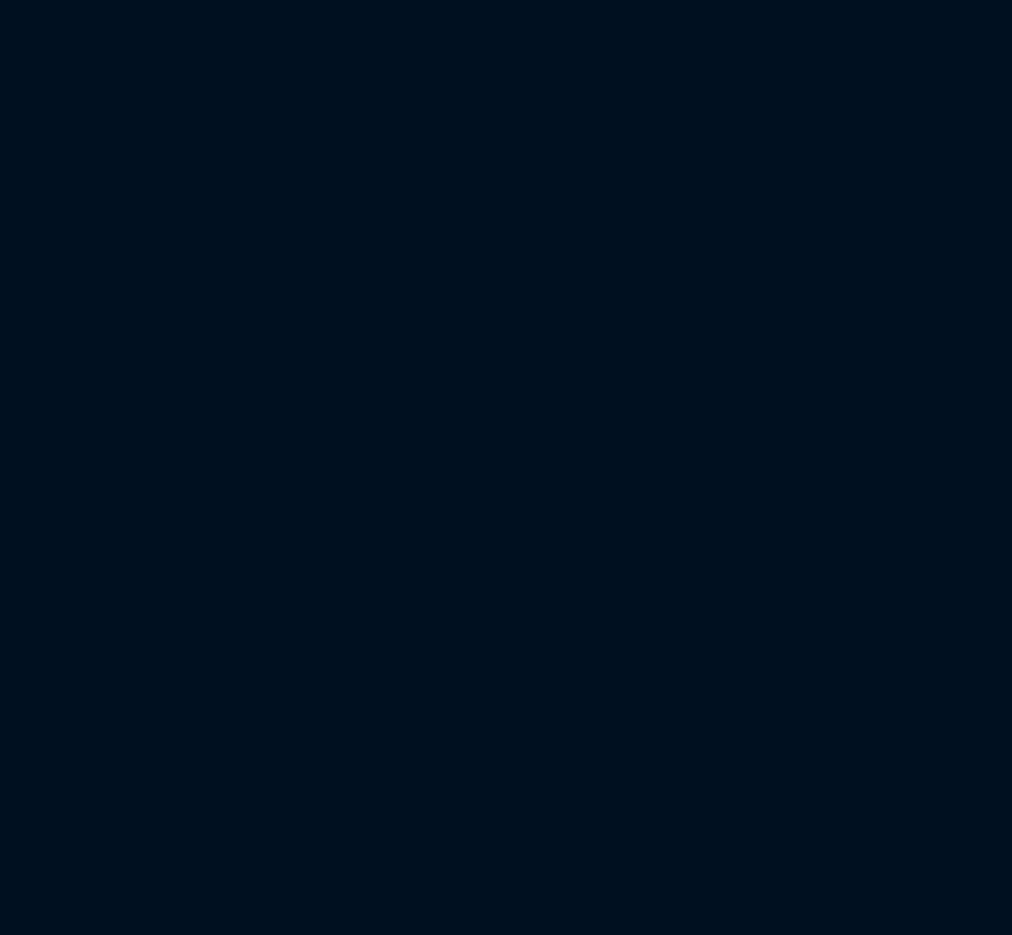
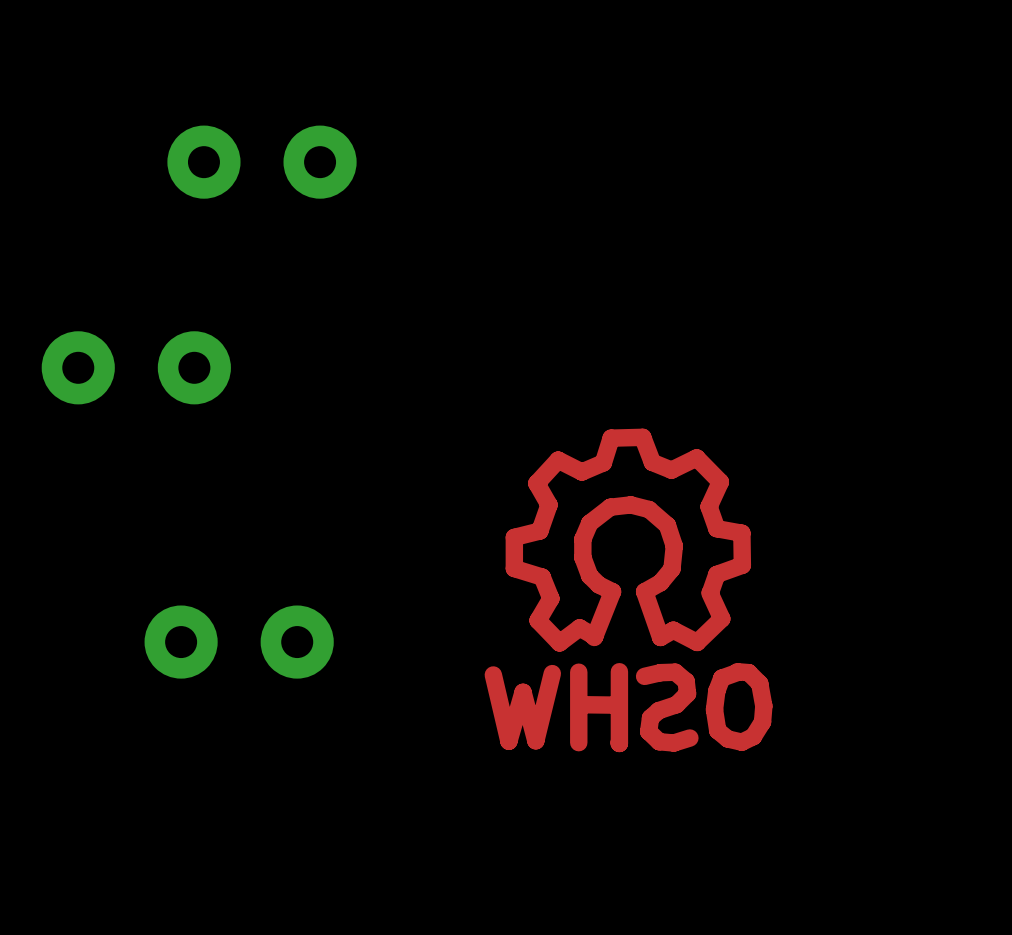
part: none -> (262, 162)
part: none -> (136, 367)
drawing: none -> [484, 428, 773, 753]
part: none -> (239, 642)

